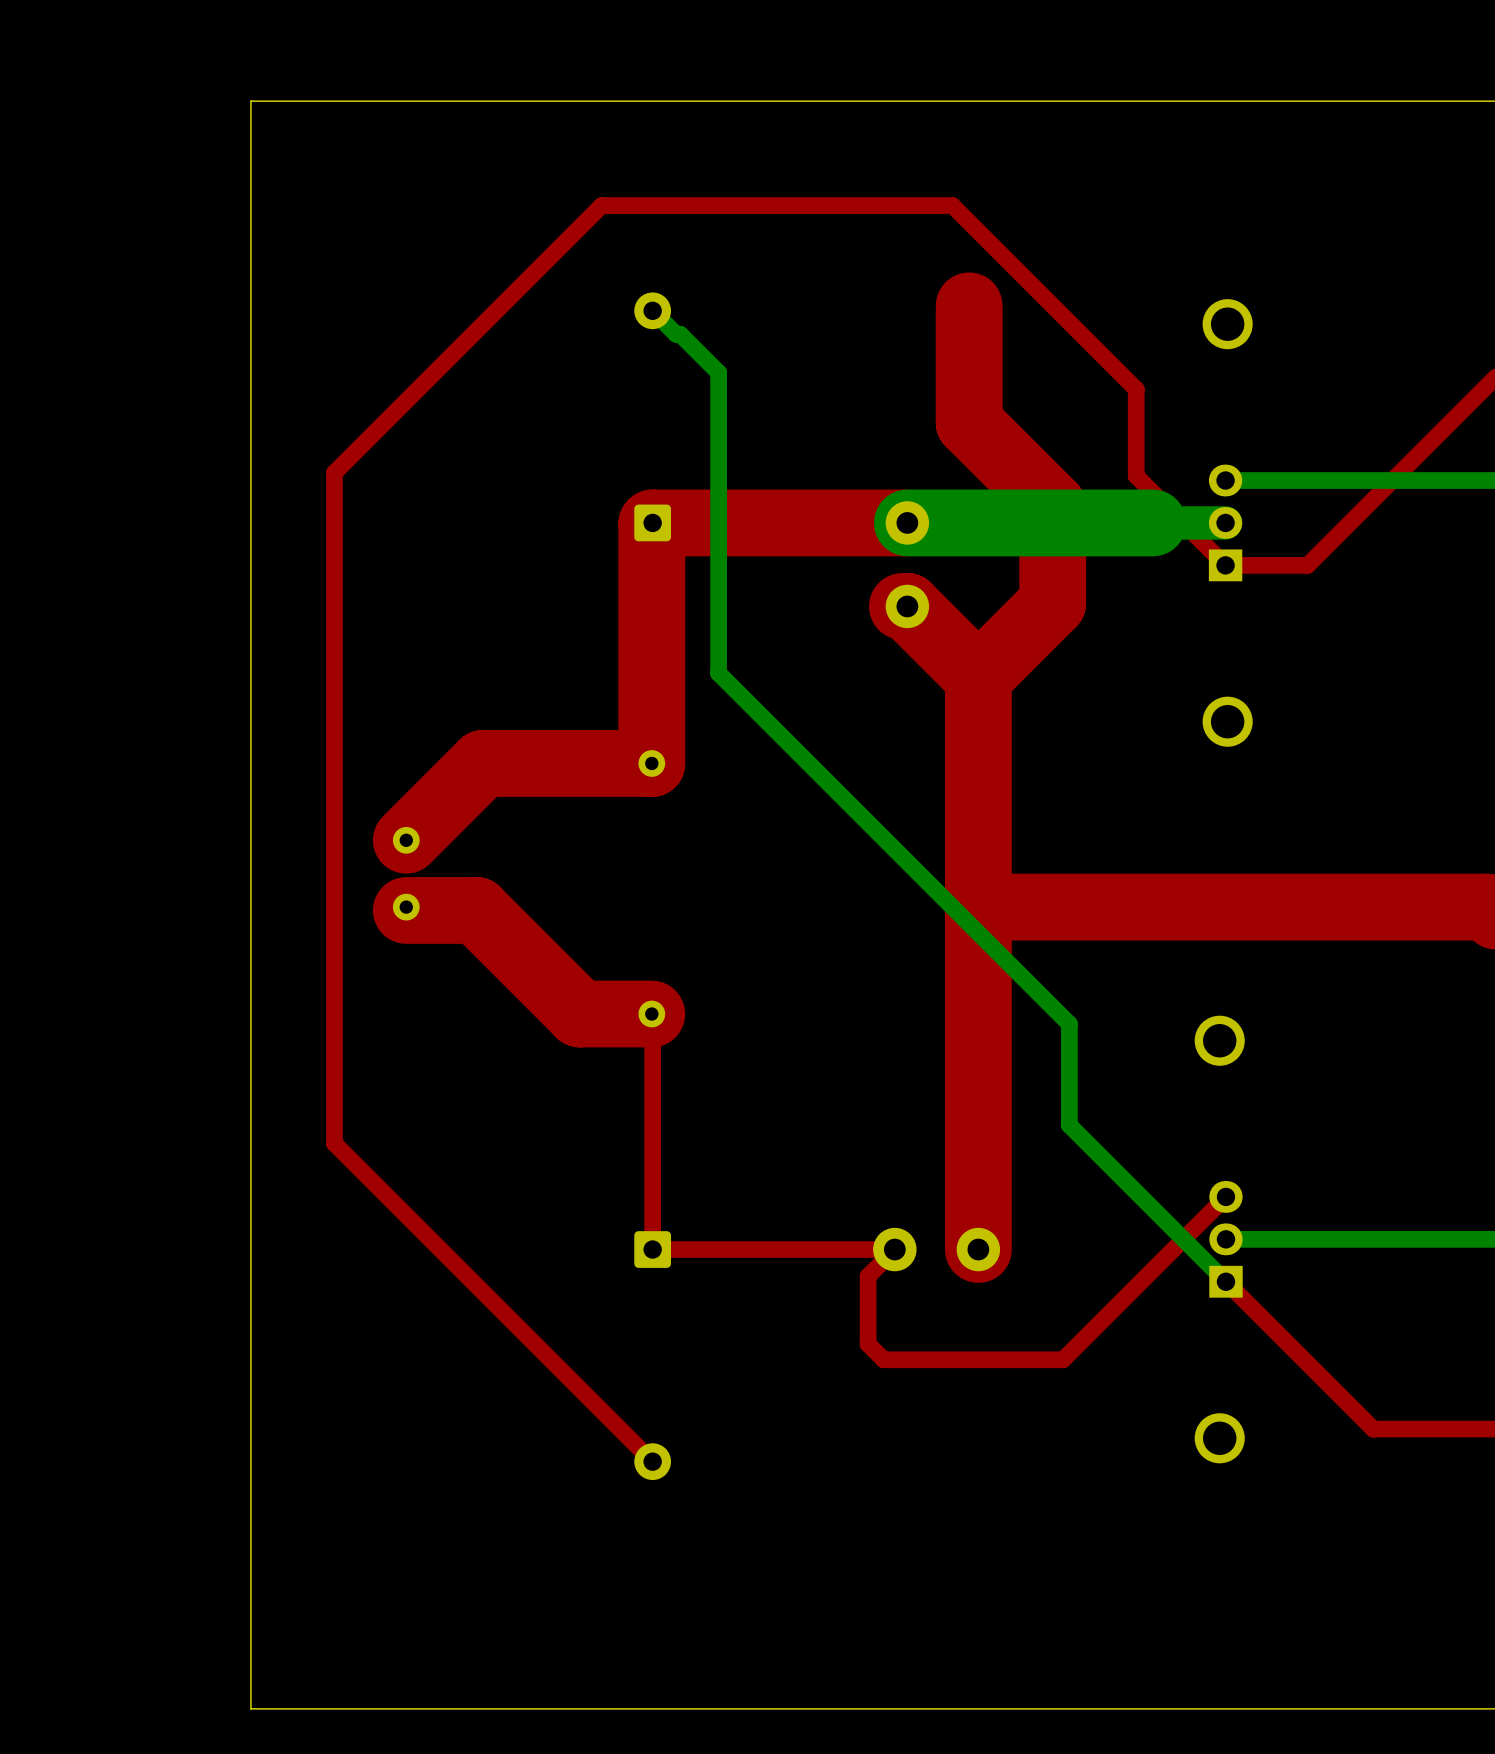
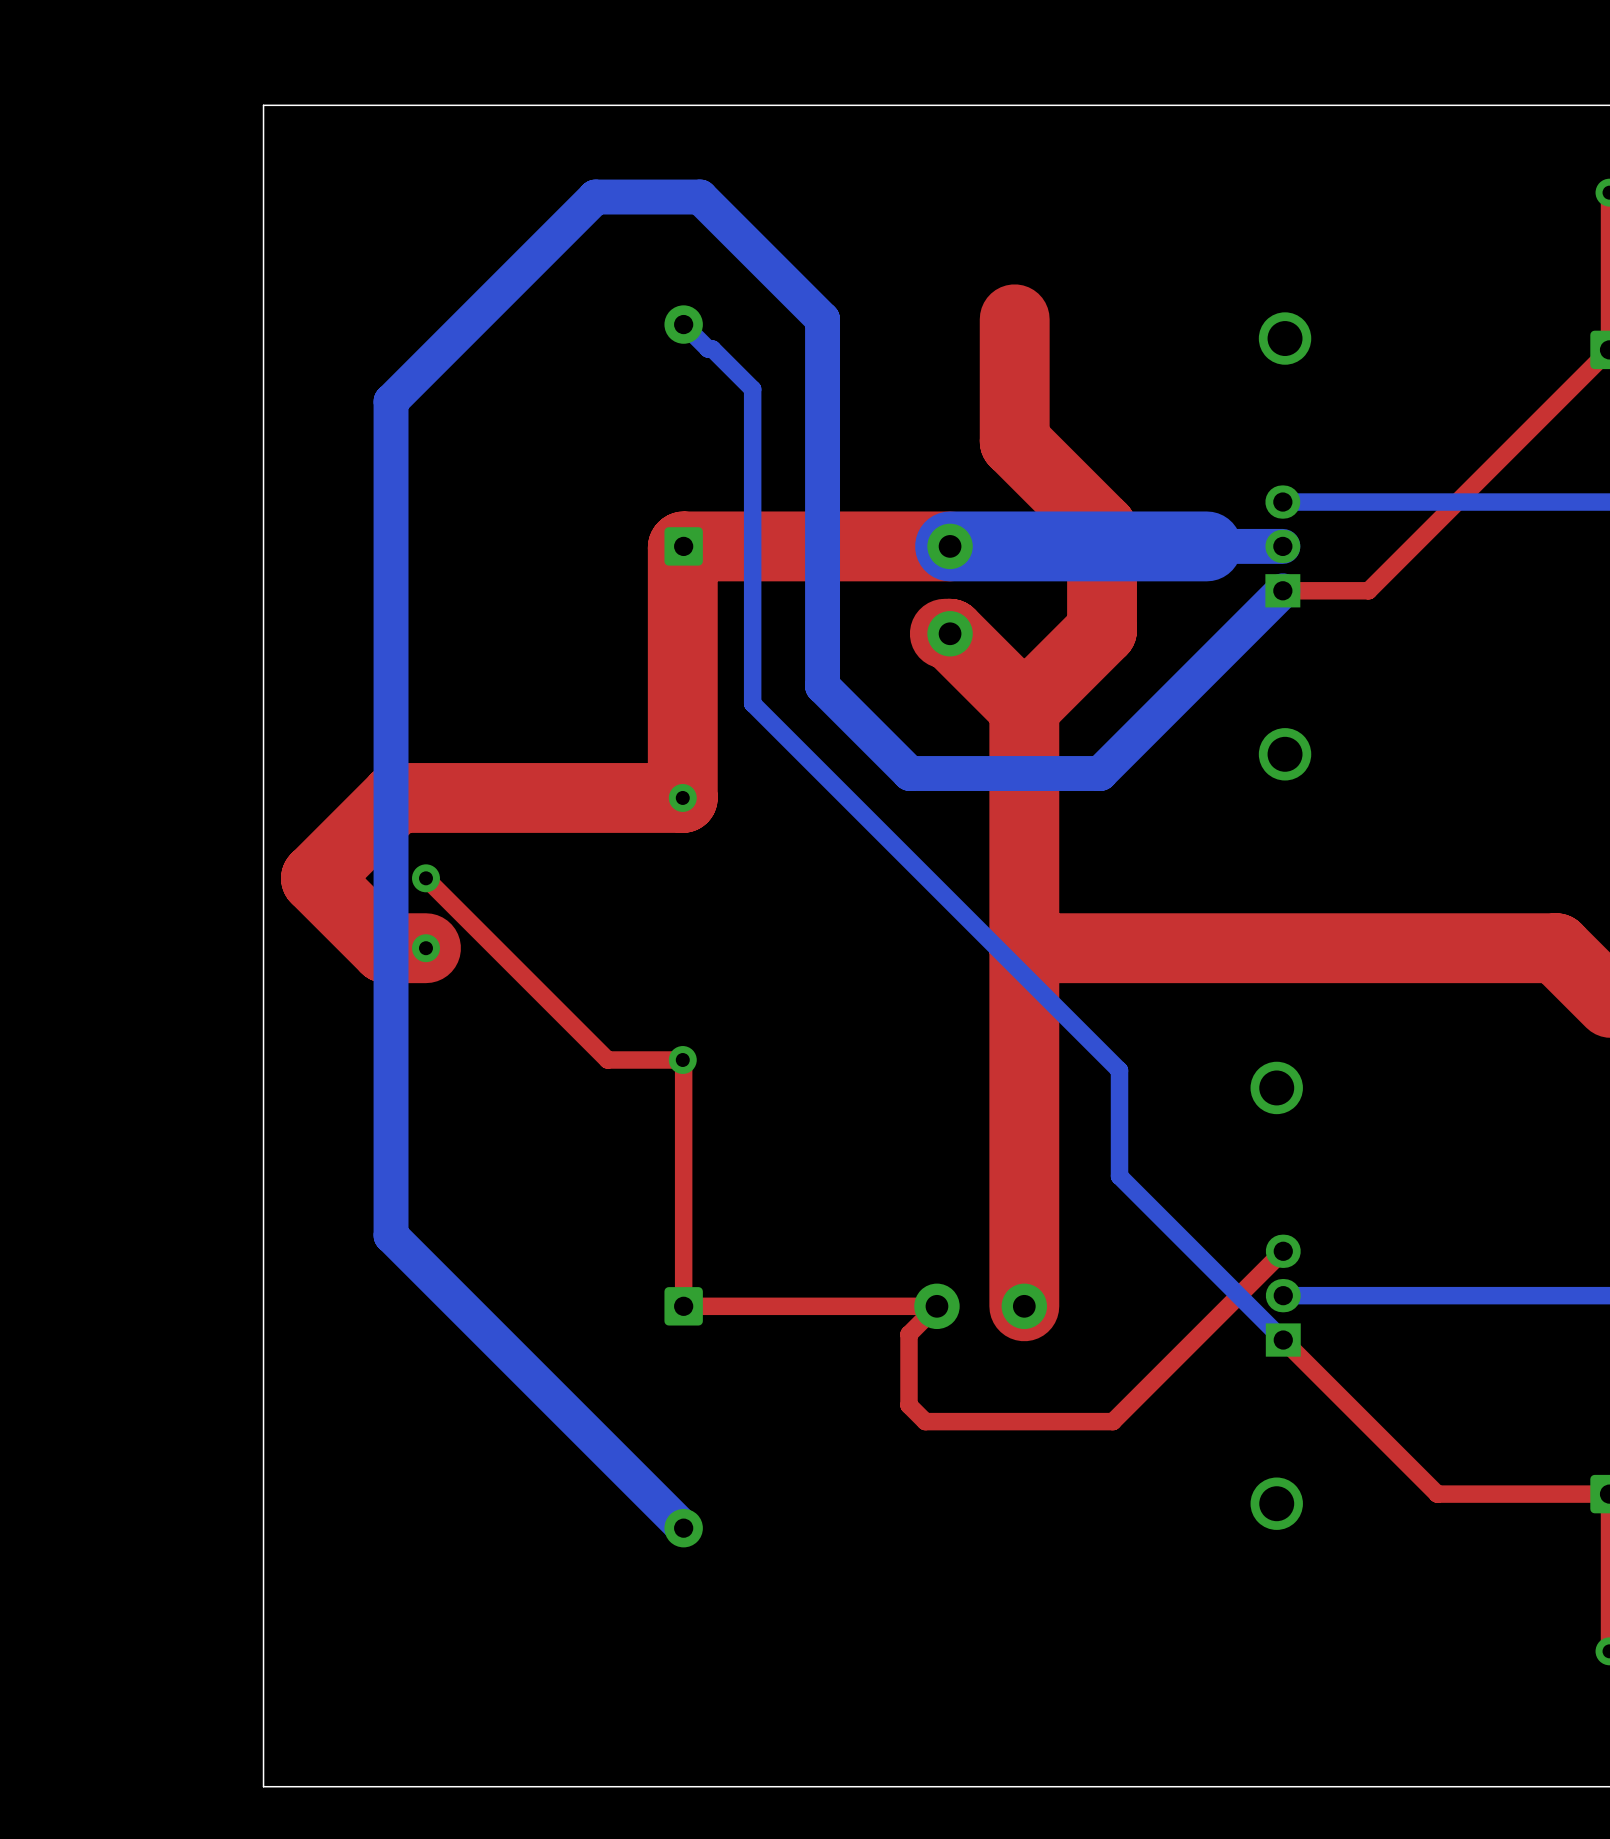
top track: (1225, 565) (1136, 476) (1136, 389) (952, 205) (601, 205) (334, 472) (334, 1143) (652, 1461) -> none
bottom track: none -> (1282, 590) (1100, 773) (909, 773) (822, 686) (822, 319) (700, 197) (595, 197) (391, 401) (391, 1235) (683, 1528)
top track: (483, 763) (406, 840) -> (506, 797) (396, 797) (315, 878) (385, 948) (425, 948)
top track: (476, 910) (406, 910) -> (499, 951) (425, 878)
top track width: thick (476, 910) (579, 1014) (651, 1014) -> thin (499, 951) (607, 1060) (682, 1060)

